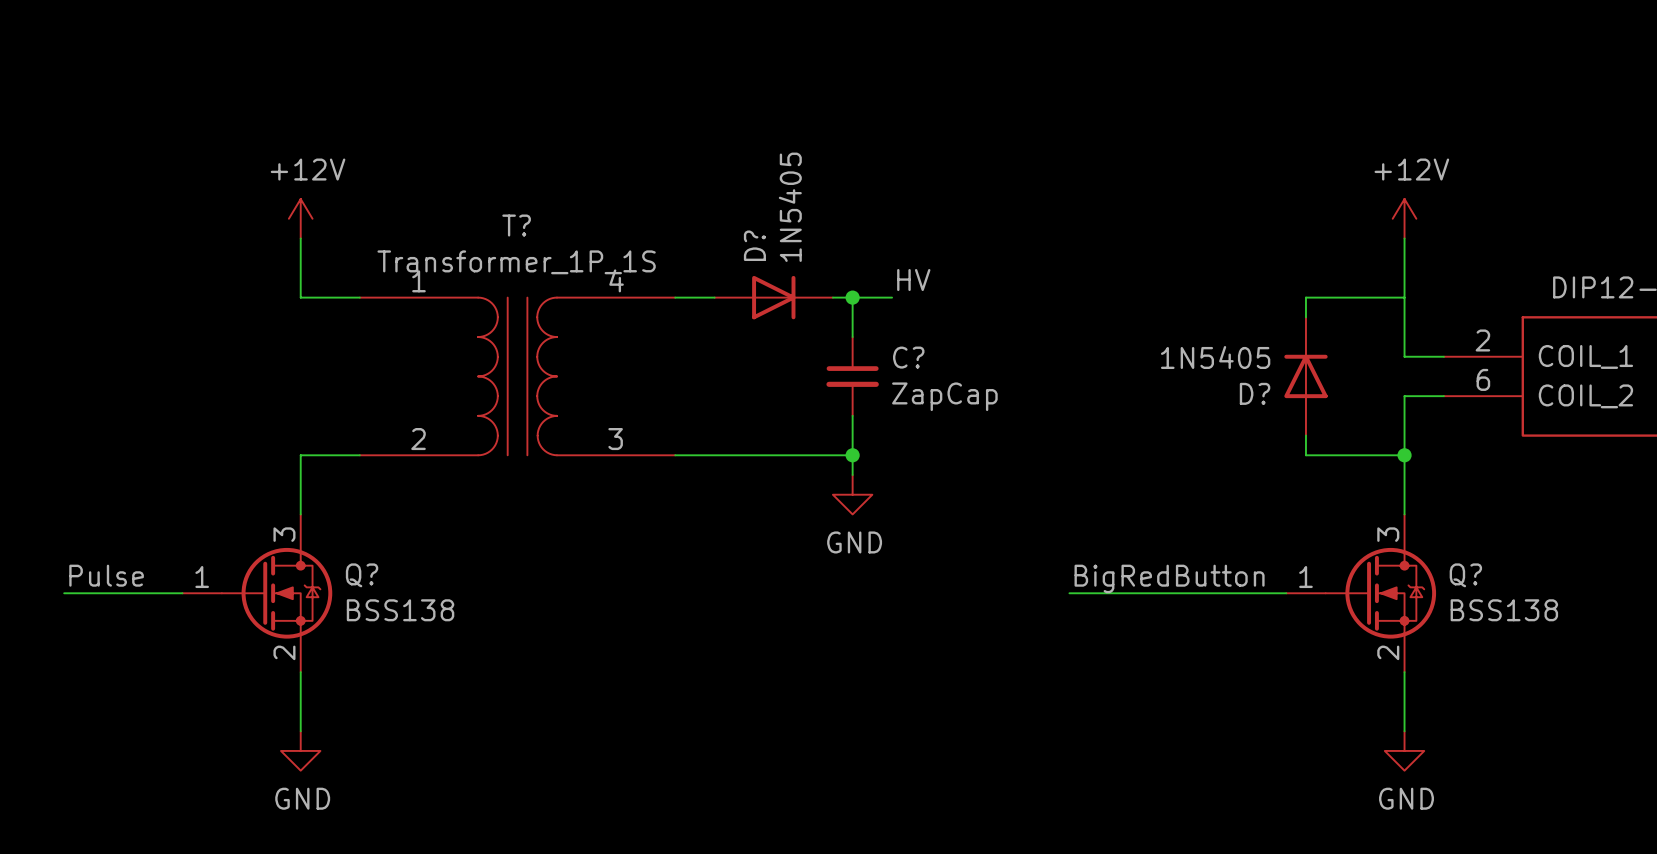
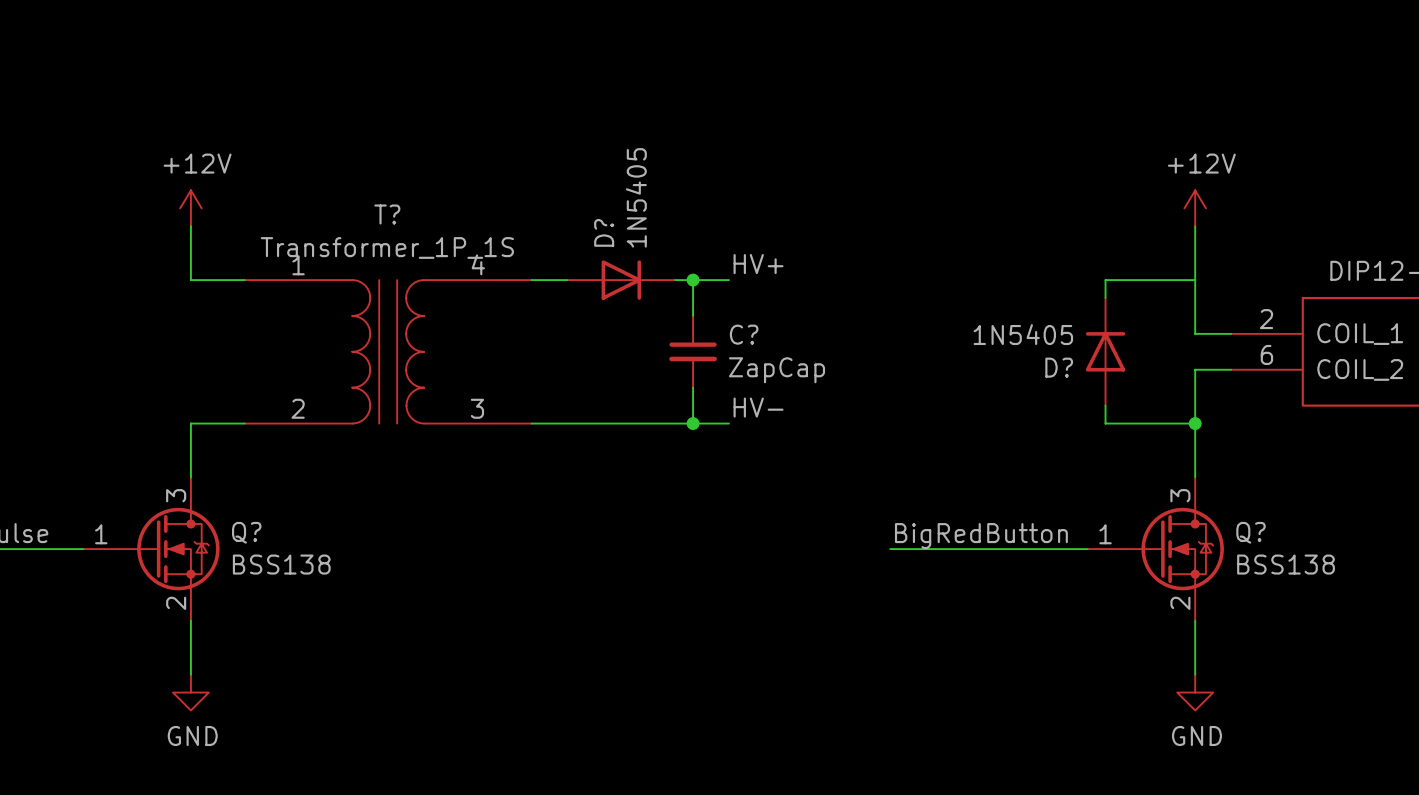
label: HV (913, 280) -> HV+ (758, 264)
label: none -> HV- (758, 407)
wire: (852, 455) (852, 475) -> (693, 423) (728, 423)
power symbol: GND (852, 494) -> none

